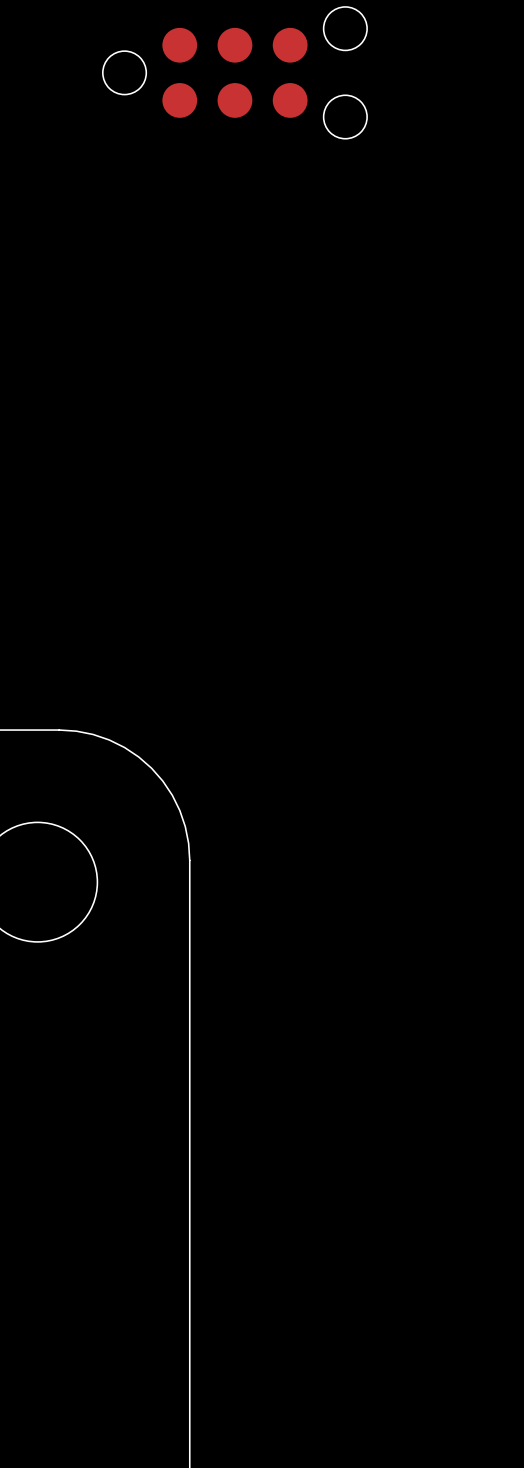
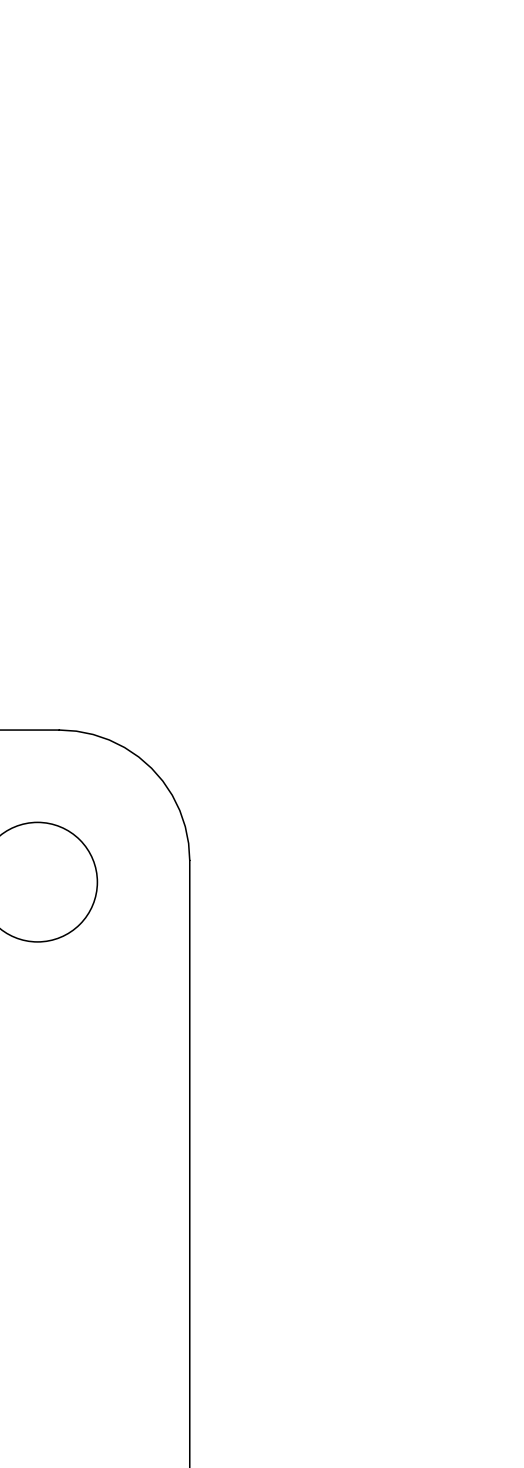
part: (234, 72) -> none

